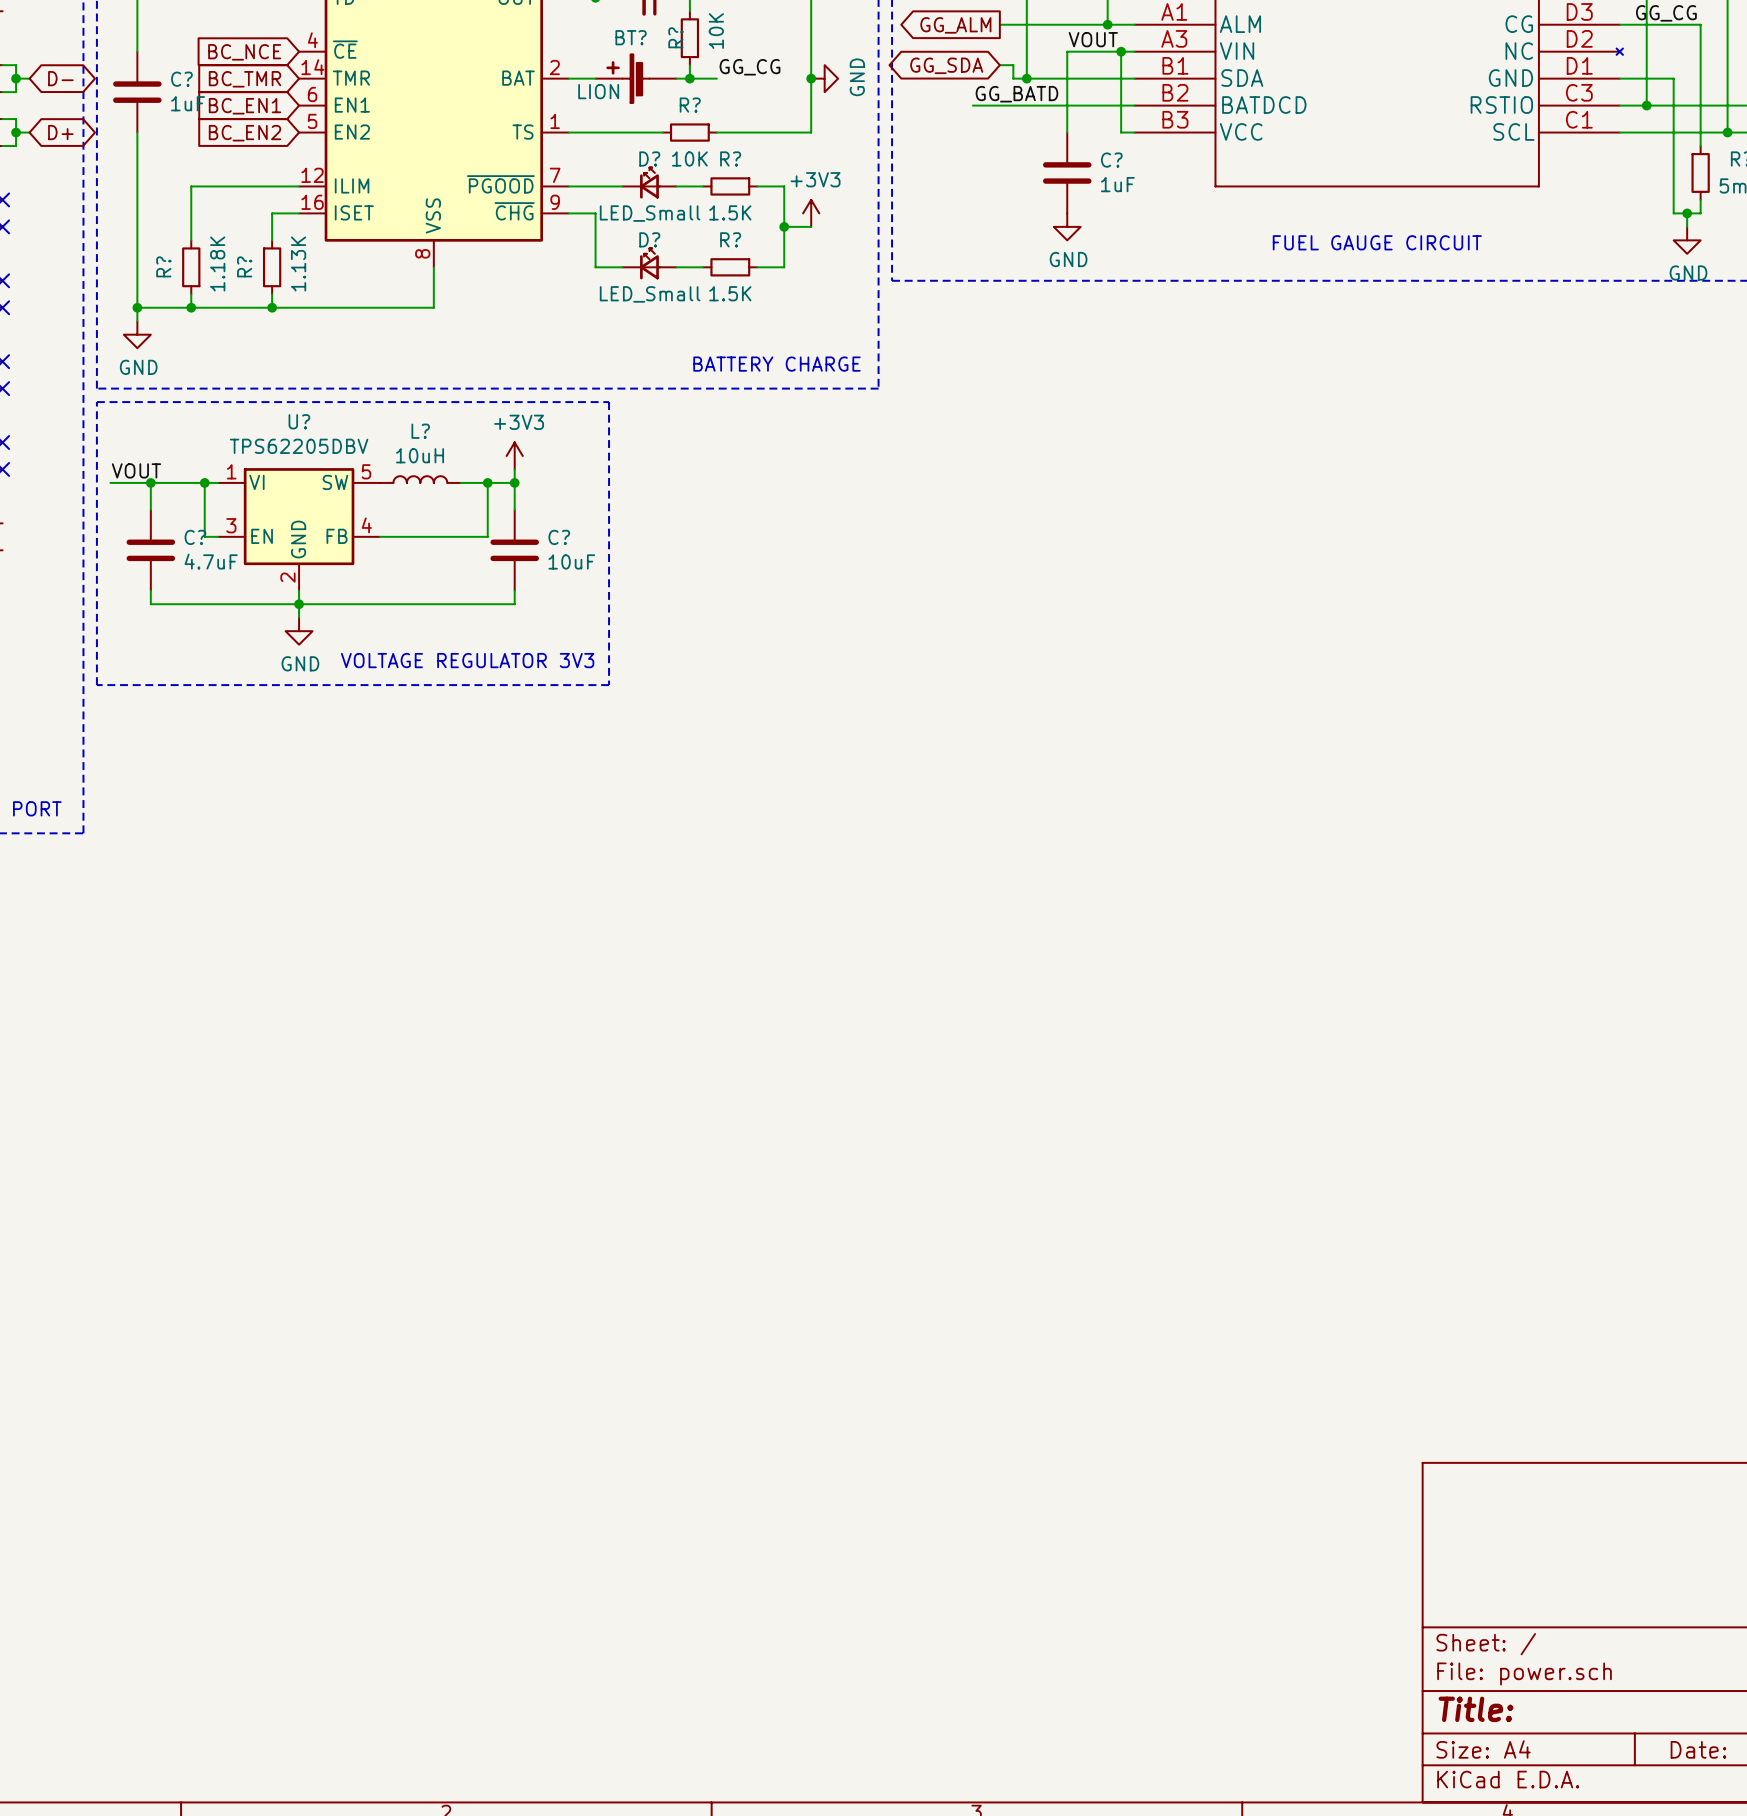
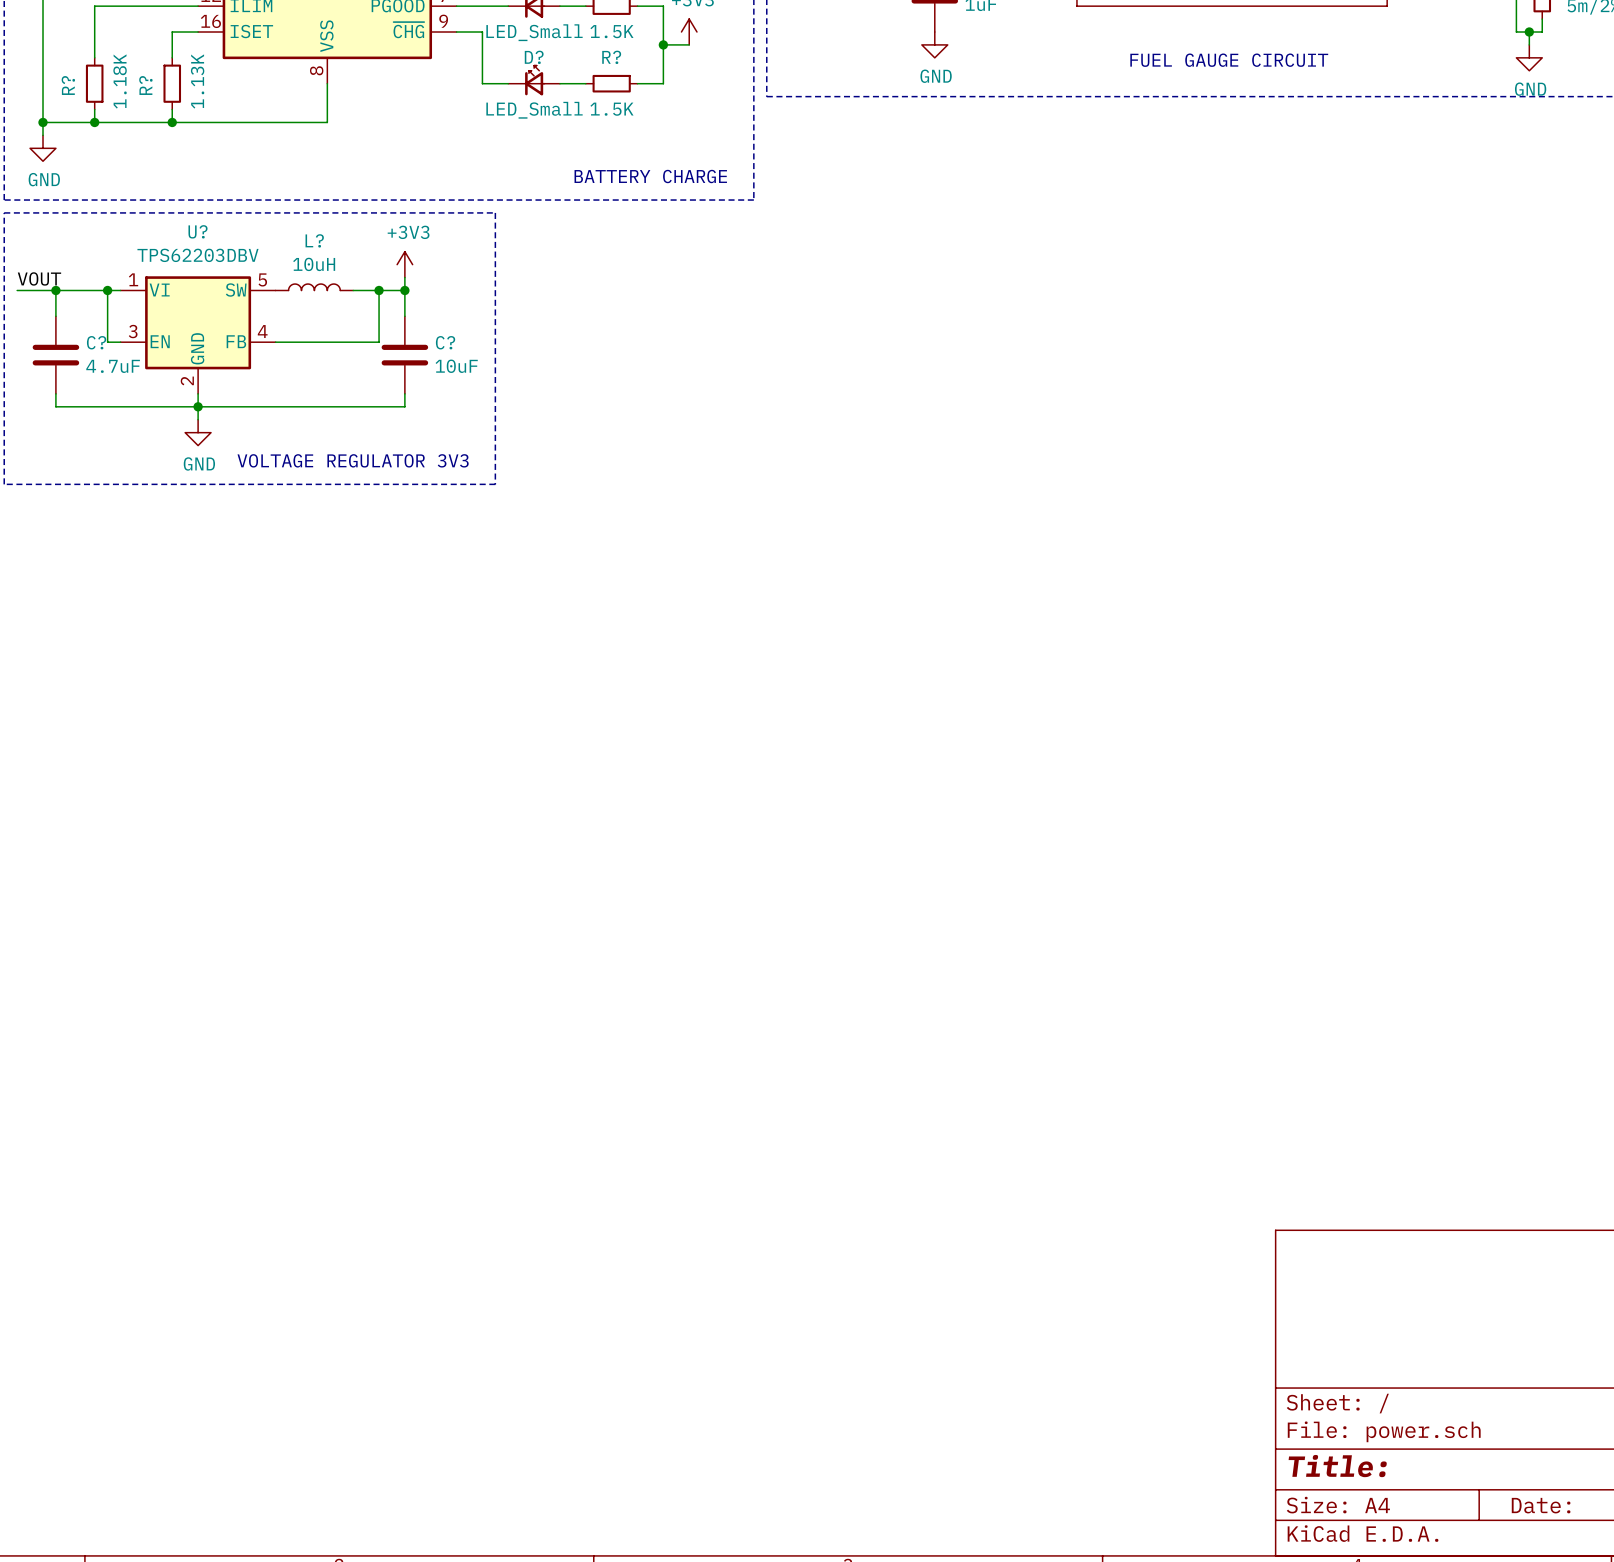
U? value: TPS62205DBV (299, 446) -> TPS62203DBV (197, 255)

